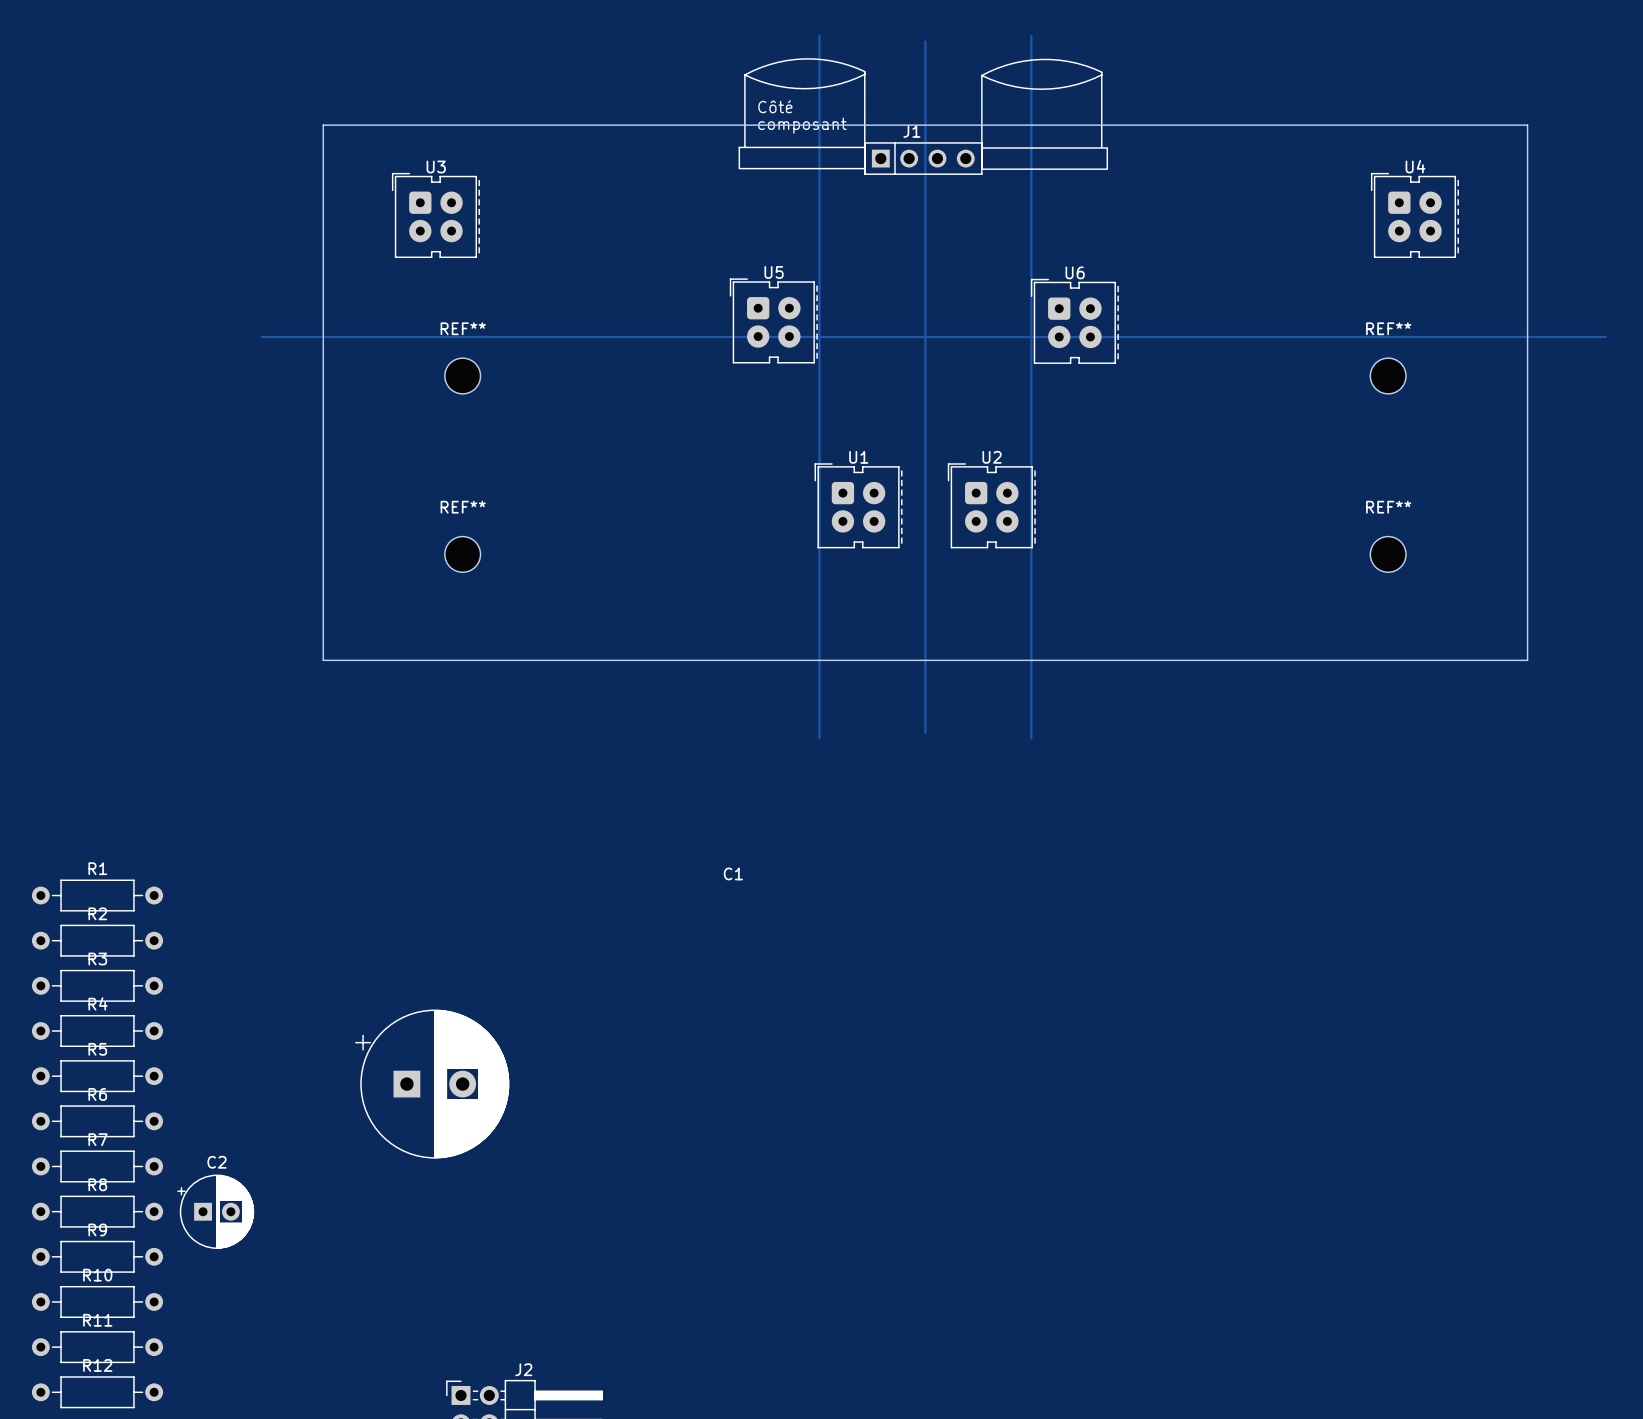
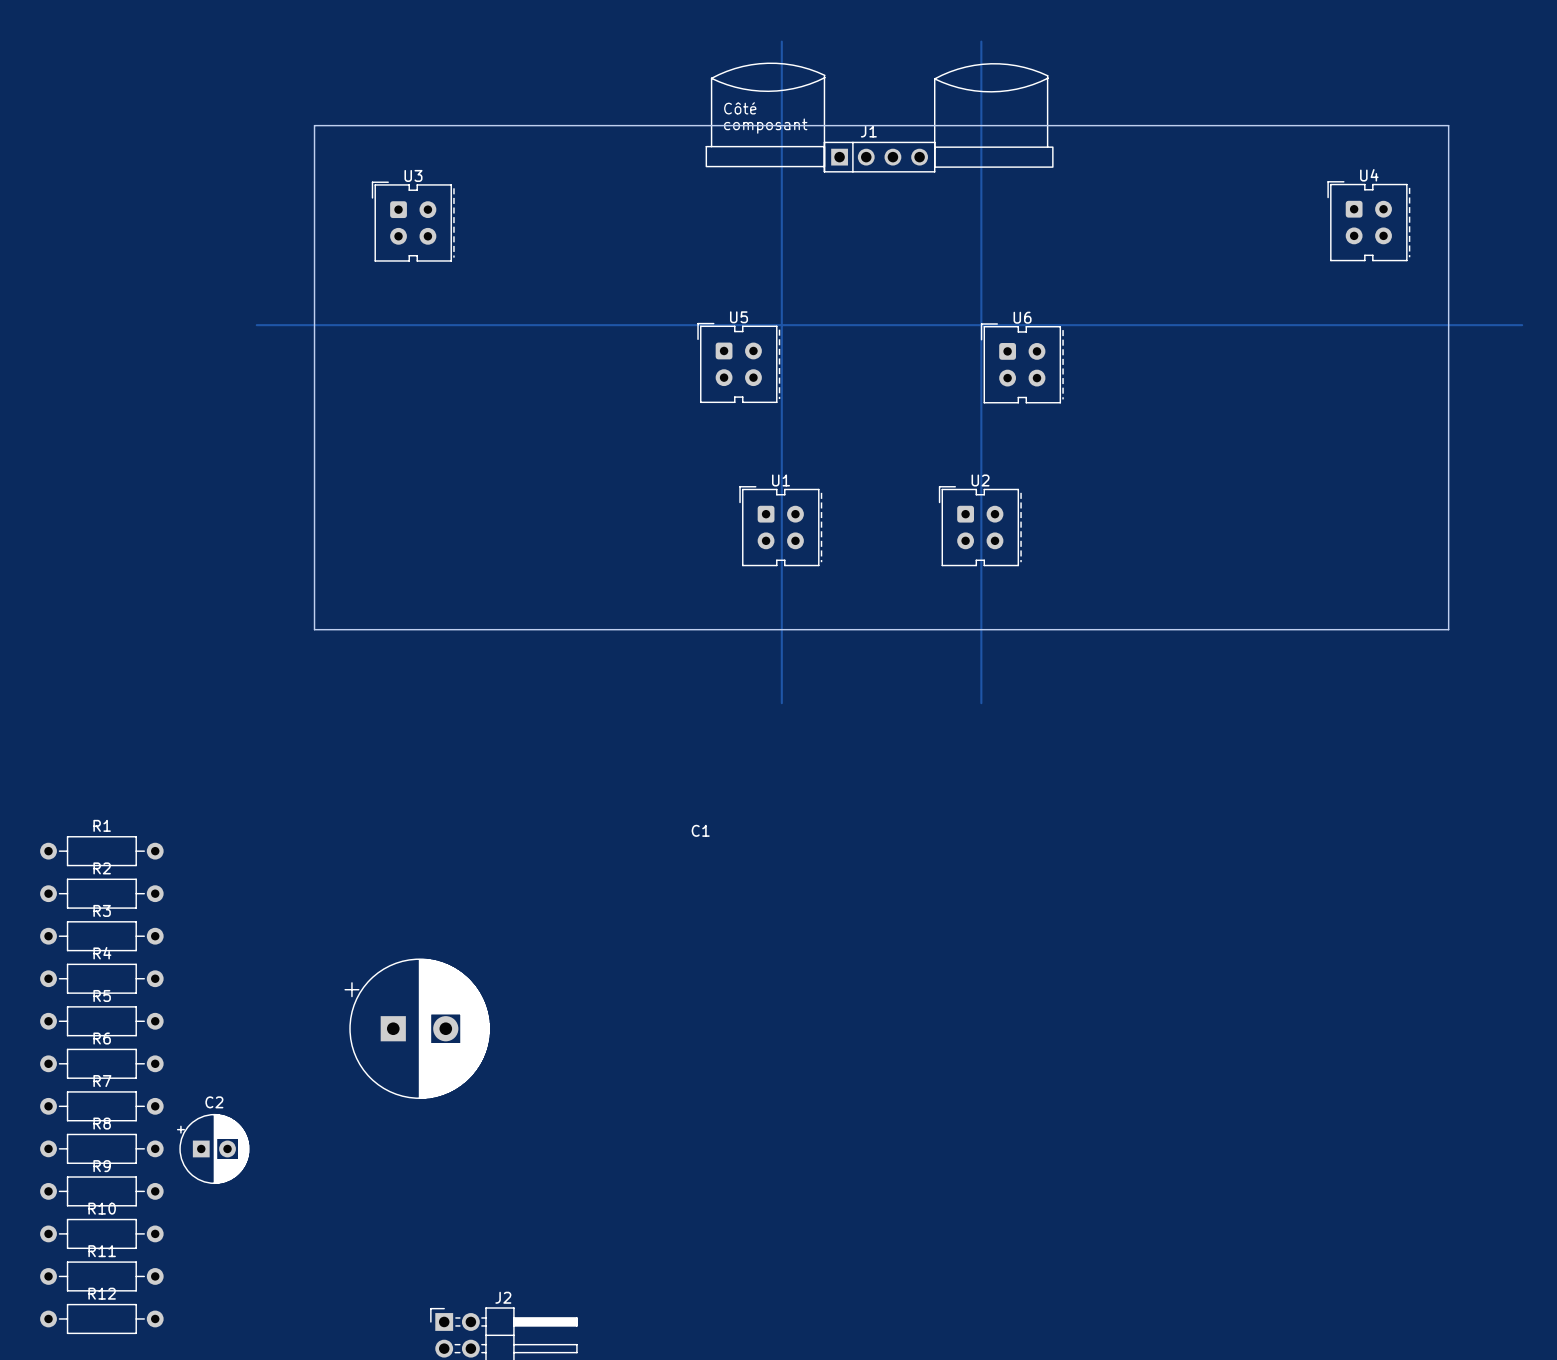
track: (925, 41) (925, 732) -> none
U3 footprint: [391, 172, 480, 258] -> [371, 181, 455, 262]
U4 footprint: [1371, 172, 1459, 258] -> [1327, 181, 1411, 262]
U5 footprint: [729, 278, 818, 364] -> [697, 322, 781, 403]
U6 footprint: [1030, 278, 1119, 364] -> [980, 323, 1064, 404]
REF**: (462, 376) -> none
REF**: (1388, 376) -> none
U1 footprint: [814, 463, 903, 549] -> [739, 486, 823, 567]
U2 footprint: [947, 463, 1036, 549] -> [938, 486, 1022, 567]
REF**: (462, 554) -> none
REF**: (1388, 554) -> none

